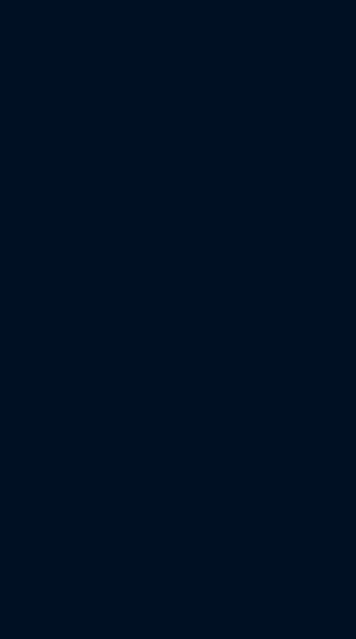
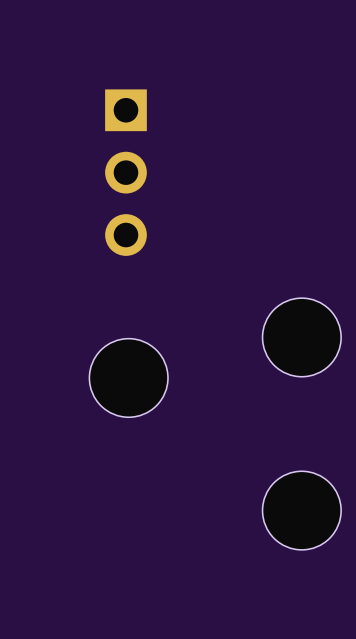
part: none -> (125, 172)
part: none -> (301, 337)
part: none -> (128, 377)
part: none -> (301, 510)

